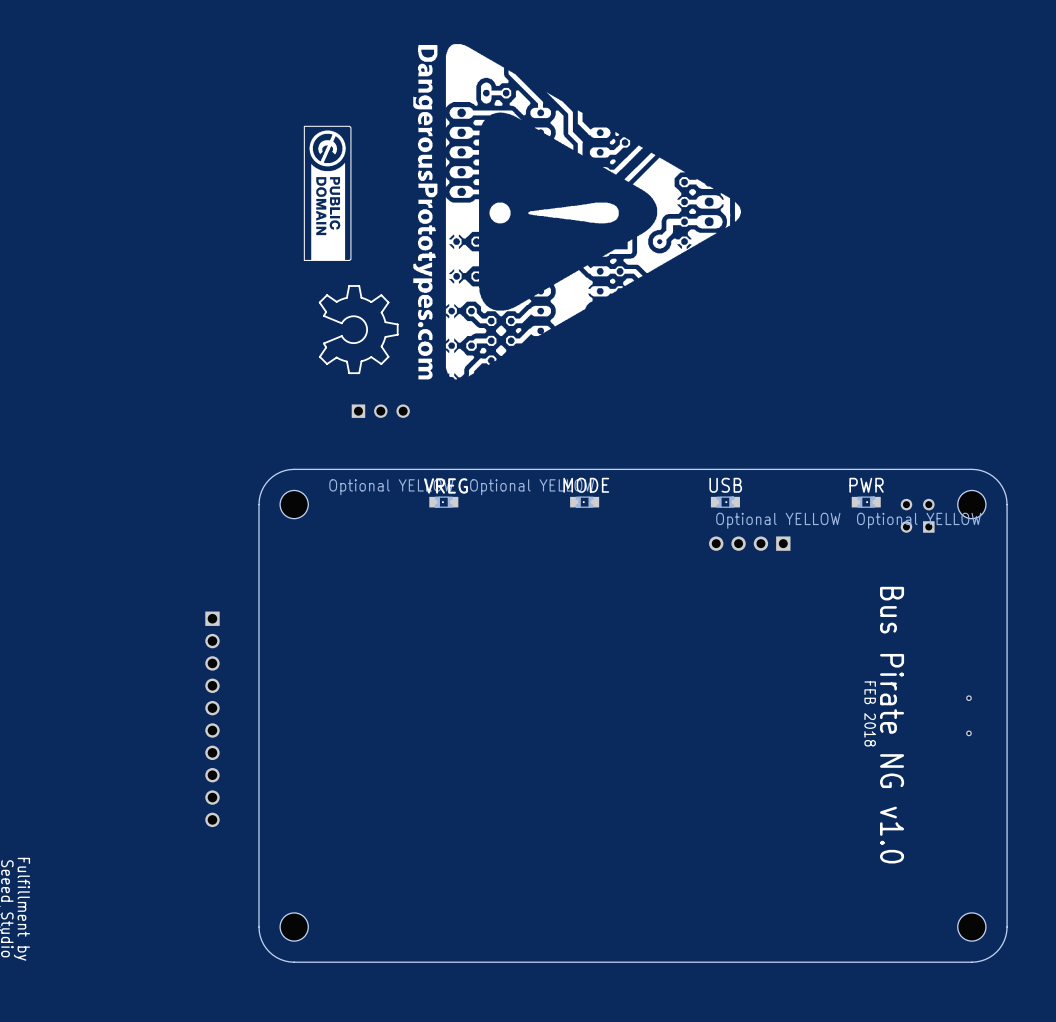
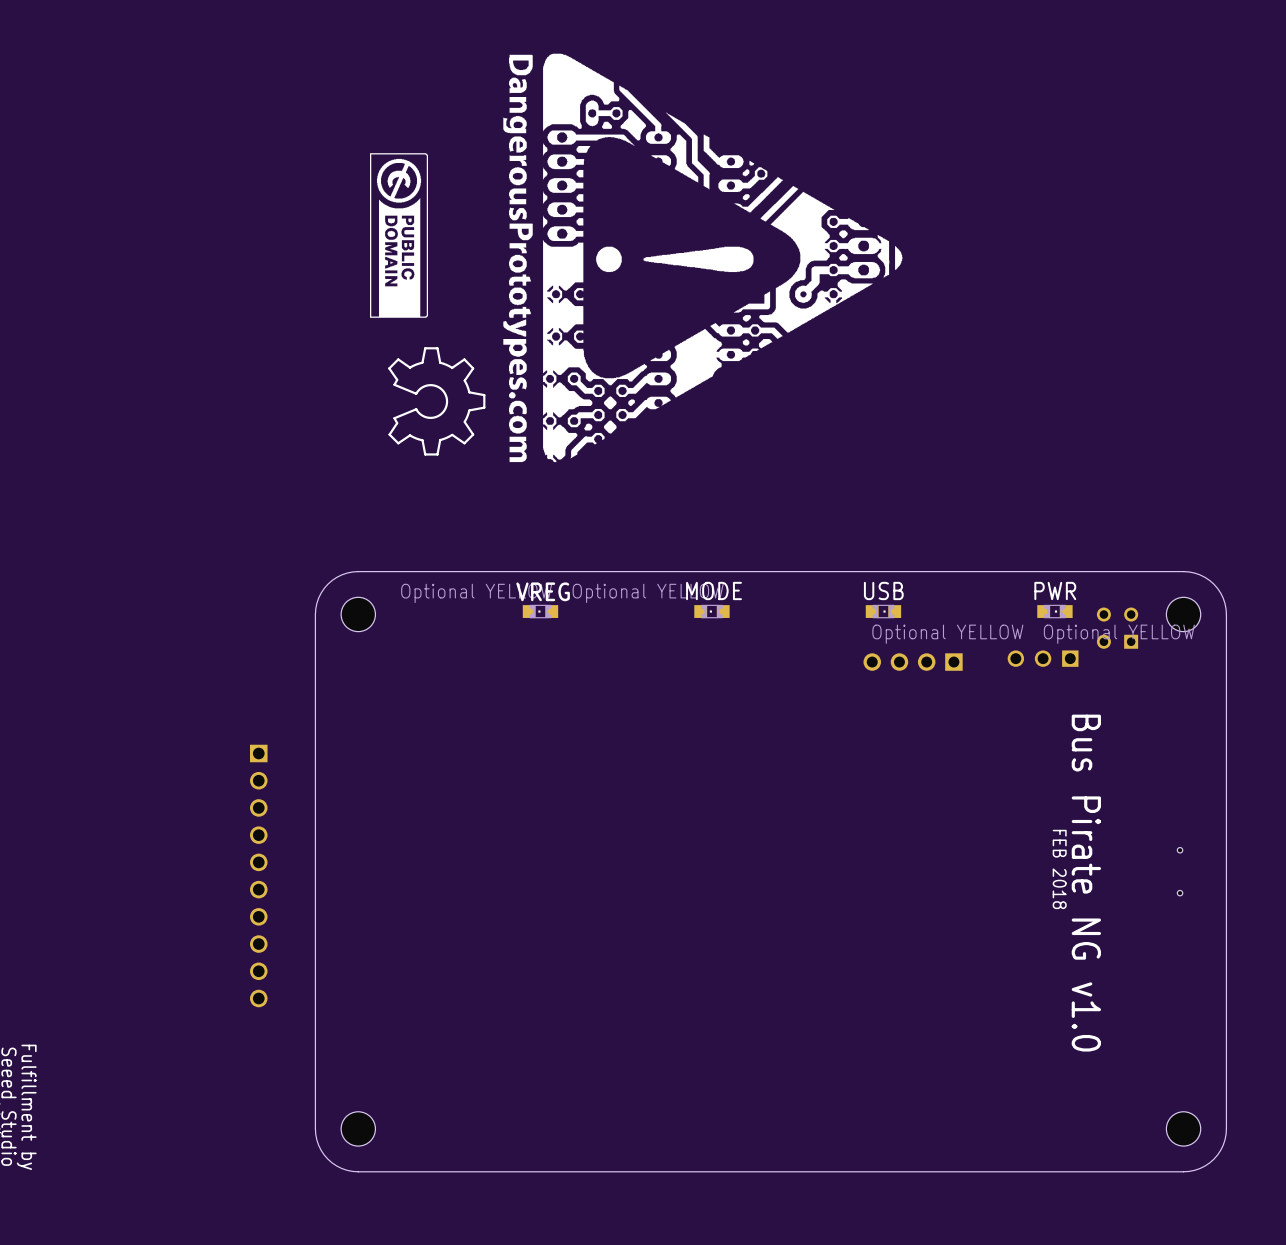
part: (380, 411) -> none
part: none -> (1043, 658)

